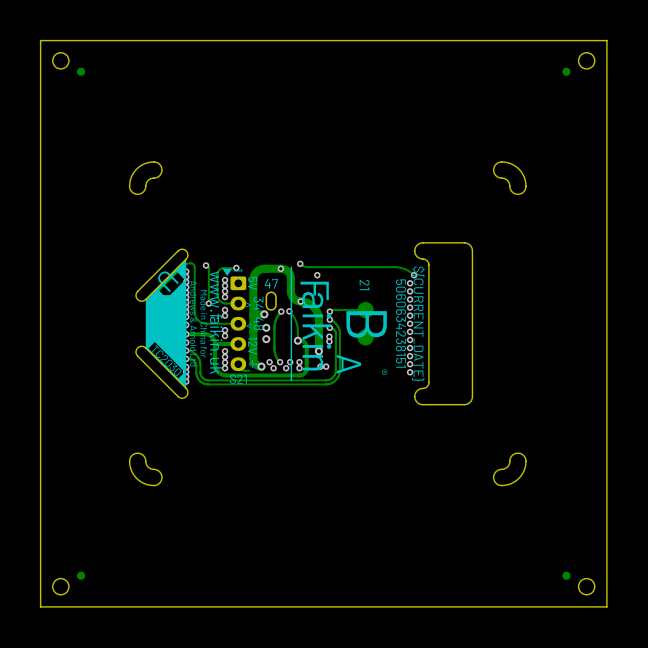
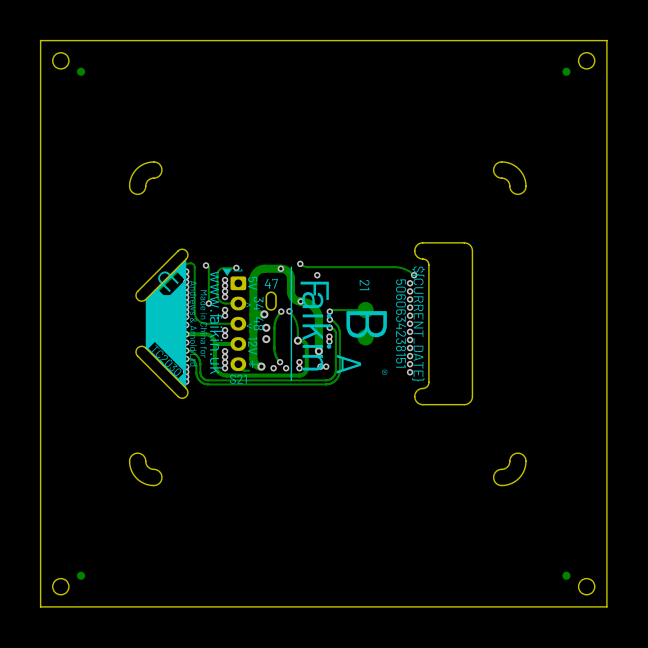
via: (269, 362) -> none
via: (290, 362) -> none

